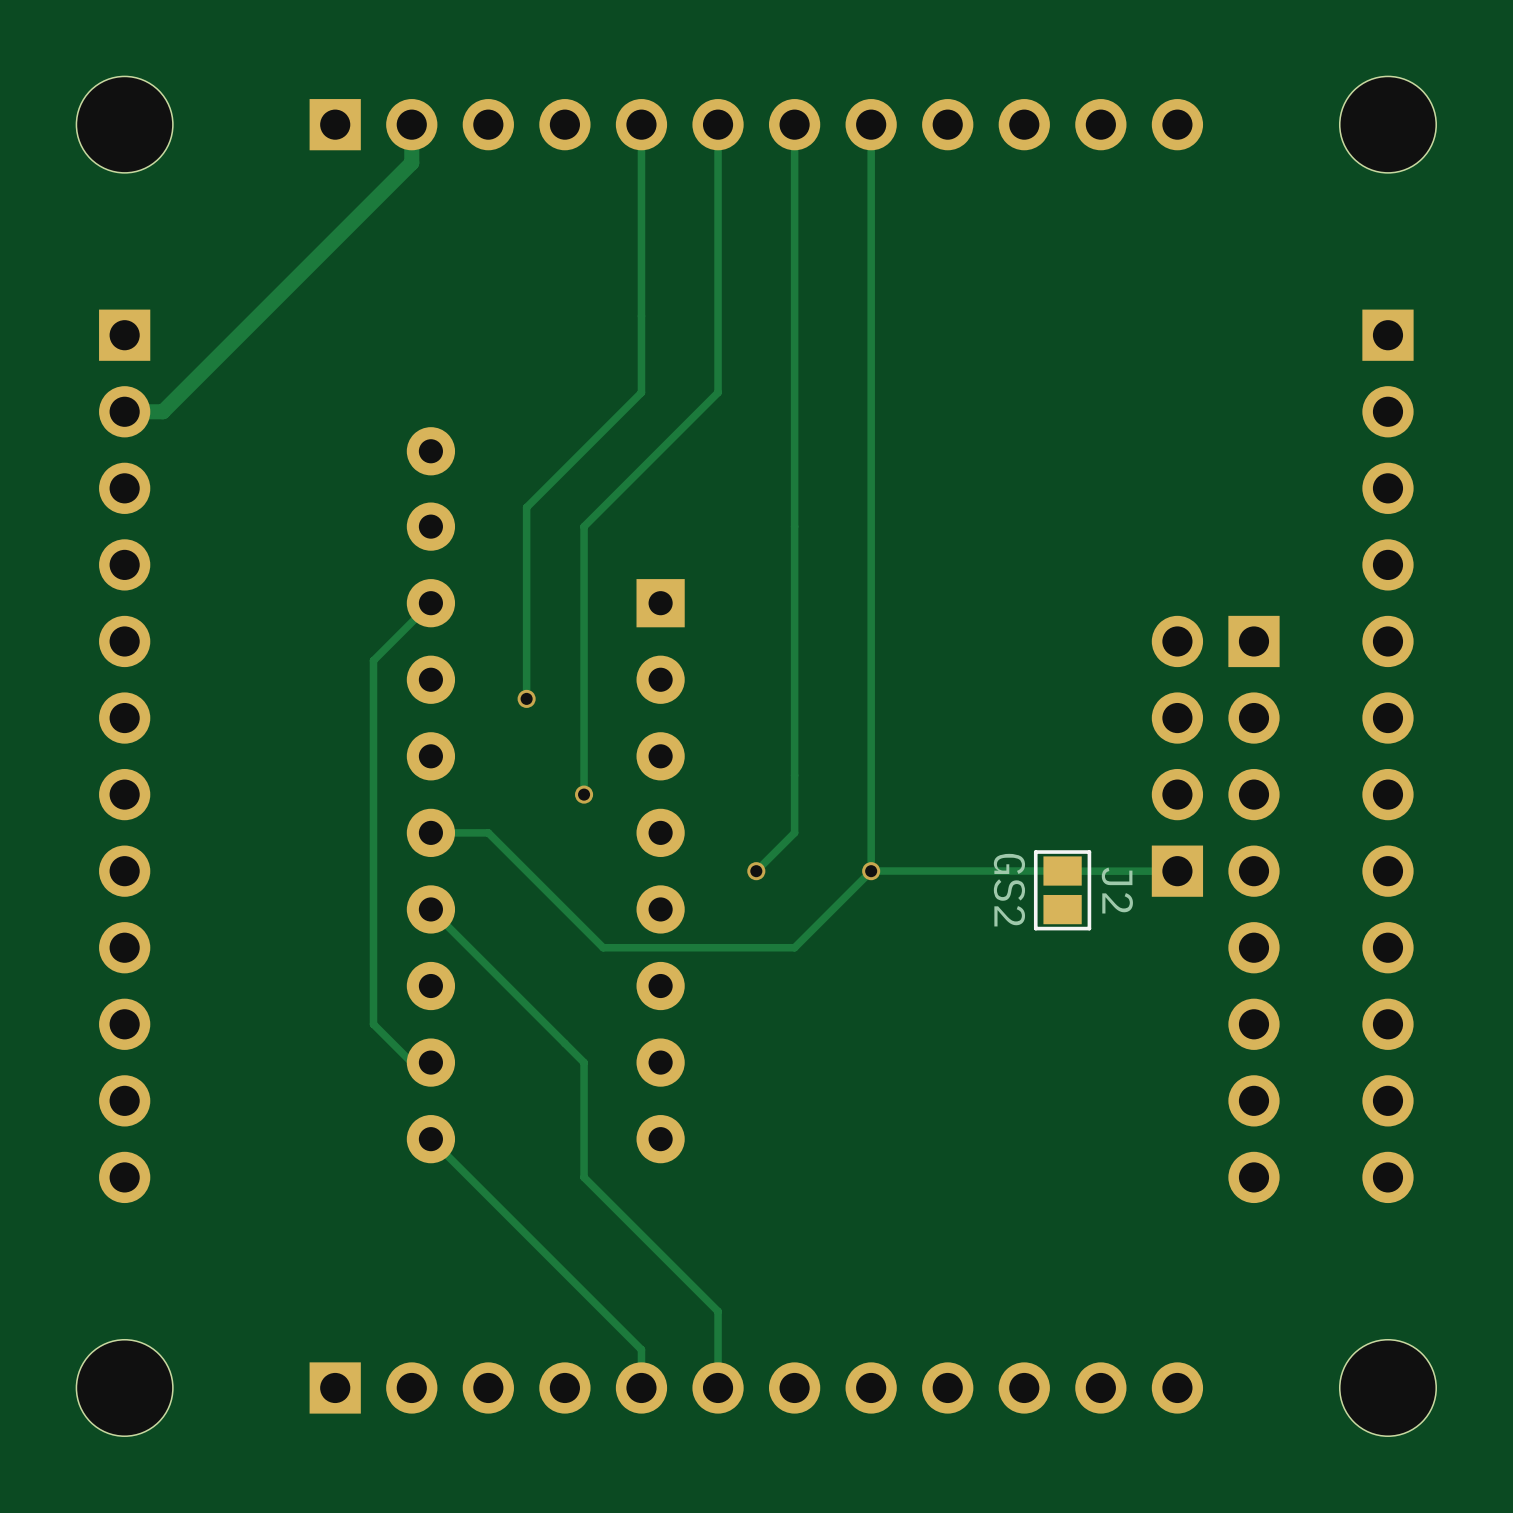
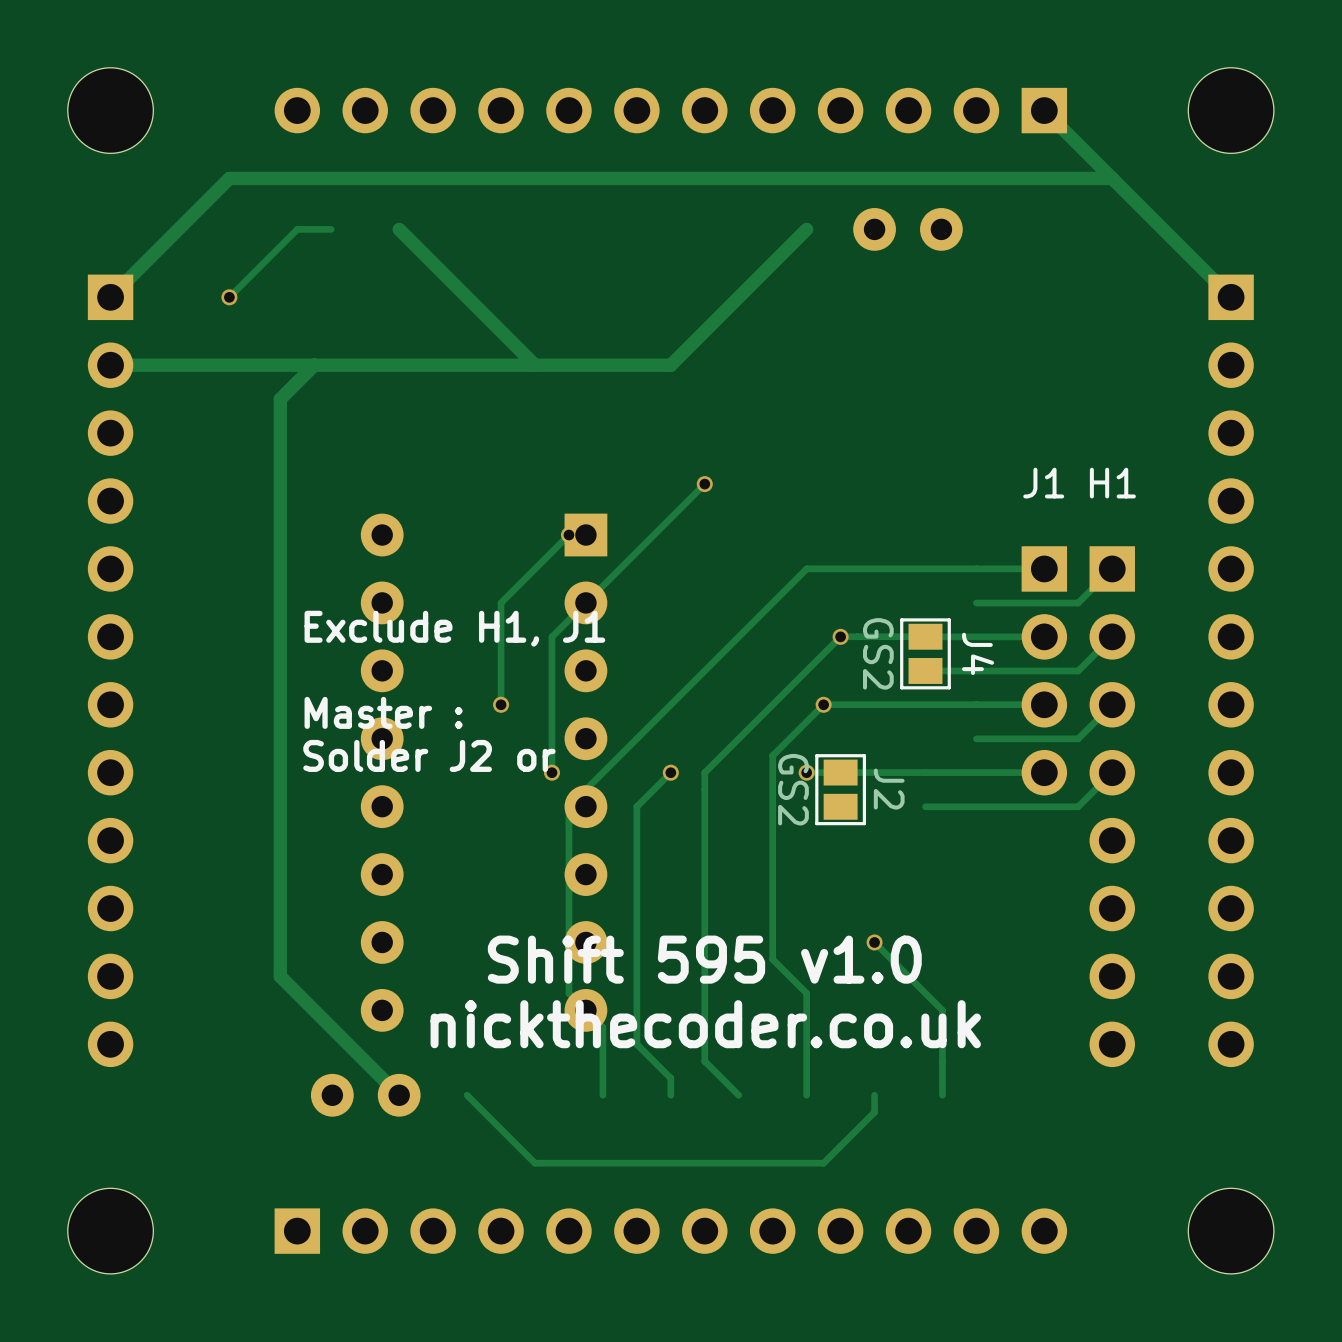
track: (411, 124) (411, 162) (162, 411) -> (806, 229) (670, 365) (144, 365)
track: (641, 124) (641, 392) (526, 507) (526, 698) -> none
track: (718, 124) (718, 392) (584, 526) (584, 794) -> none
part rotation: 0° (756, 124) -> 180° (670, 110)
track: (794, 124) (794, 832) (756, 871) -> (670, 1095) (670, 1078) (636, 1044) (636, 806) (670, 772)
track: (871, 124) (871, 852) -> (1044, 704) (823, 704) (772, 755)
track: none -> (1044, 110) (1231, 297)
track: none -> (1112, 178) (229, 178) (110, 297)
track: none -> (331, 229) (297, 229) (229, 297)
track: none -> (399, 229) (535, 365)
part: none -> (907, 229)
via: none -> (229, 297)
track: none -> (314, 365) (280, 399) (280, 976) (399, 1095)
part: (430, 488) -> none
H1 name: none -> H1 (1112, 483)
track: none -> (704, 484) (551, 636) (551, 772)
via: none -> (704, 484)
track: (430, 603) (373, 660) (373, 1024) (411, 1062) (430, 1062) -> none
track: none -> (568, 535) (501, 602) (501, 704)
via: none -> (568, 535)
track: none -> (1044, 568) (806, 568) (568, 806) (568, 993) (602, 1027) (602, 1095)
track: none -> (1112, 568) (1078, 603) (976, 603)
via: (526, 698) -> none
text: none -> Exclude H1, J1 (454, 628)
track: none -> (925, 636) (840, 636) (704, 772) (704, 1061) (738, 1095)
via: none -> (840, 636)
track: none -> (1044, 636) (925, 636)
track: none -> (1112, 636) (1078, 670) (925, 670)
J4: none -> GS2 (925, 653)
part: (1177, 756) -> none
J1: none -> (1044, 670)
via position: (584, 794) -> (501, 704)
via: none -> (823, 704)
track: none -> (1112, 704) (1078, 738) (976, 738)
text: none -> Master : (383, 712)
track: (430, 832) (488, 832) (603, 947) (794, 947) (871, 871) (909, 871) -> none
text: none -> Solder J2 or (429, 755)
via: none -> (551, 772)
track: none -> (772, 772) (772, 959) (806, 993) (806, 1095)
via position: (871, 871) -> (806, 772)
track: none -> (1112, 772) (1078, 806) (925, 806)
J2 position: (1062, 890) -> (840, 789)
track: (430, 909) (584, 1062) (584, 1177) (718, 1311) (718, 1387) -> none
track: none -> (874, 942) (942, 1010) (942, 1095)
via: none -> (874, 942)
text: none -> Shift 595 v1.0 (704, 959)
track: (430, 1139) (526, 1234) -> none
text: none -> nickthecoder.co.uk (705, 1024)
part: none -> (365, 1095)
track: (603, 1311) (641, 1349) (641, 1387) -> (535, 1163) (823, 1163) (874, 1112) (874, 1095)

